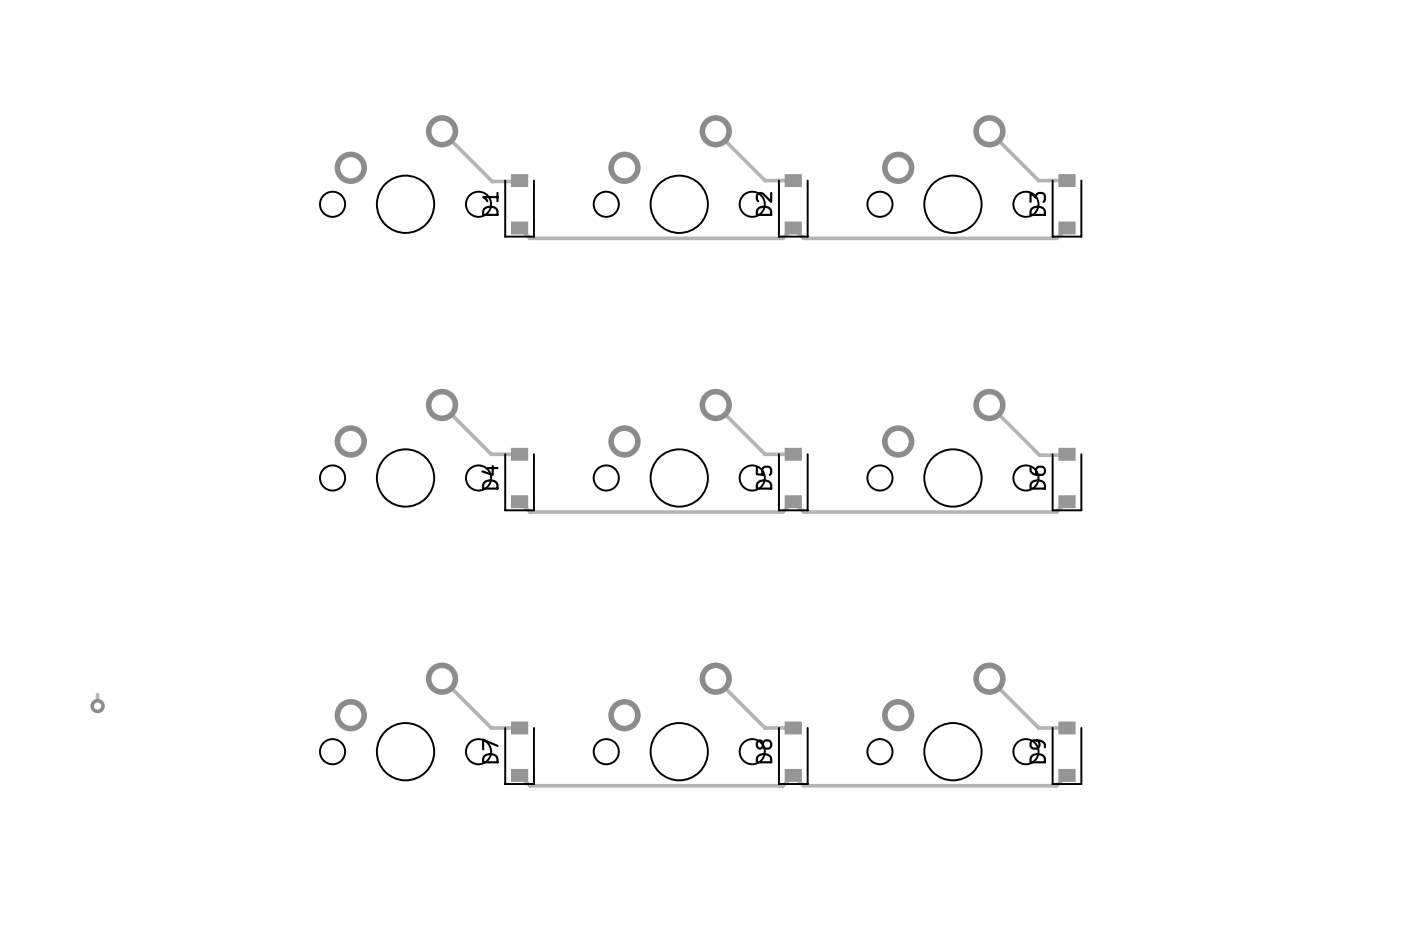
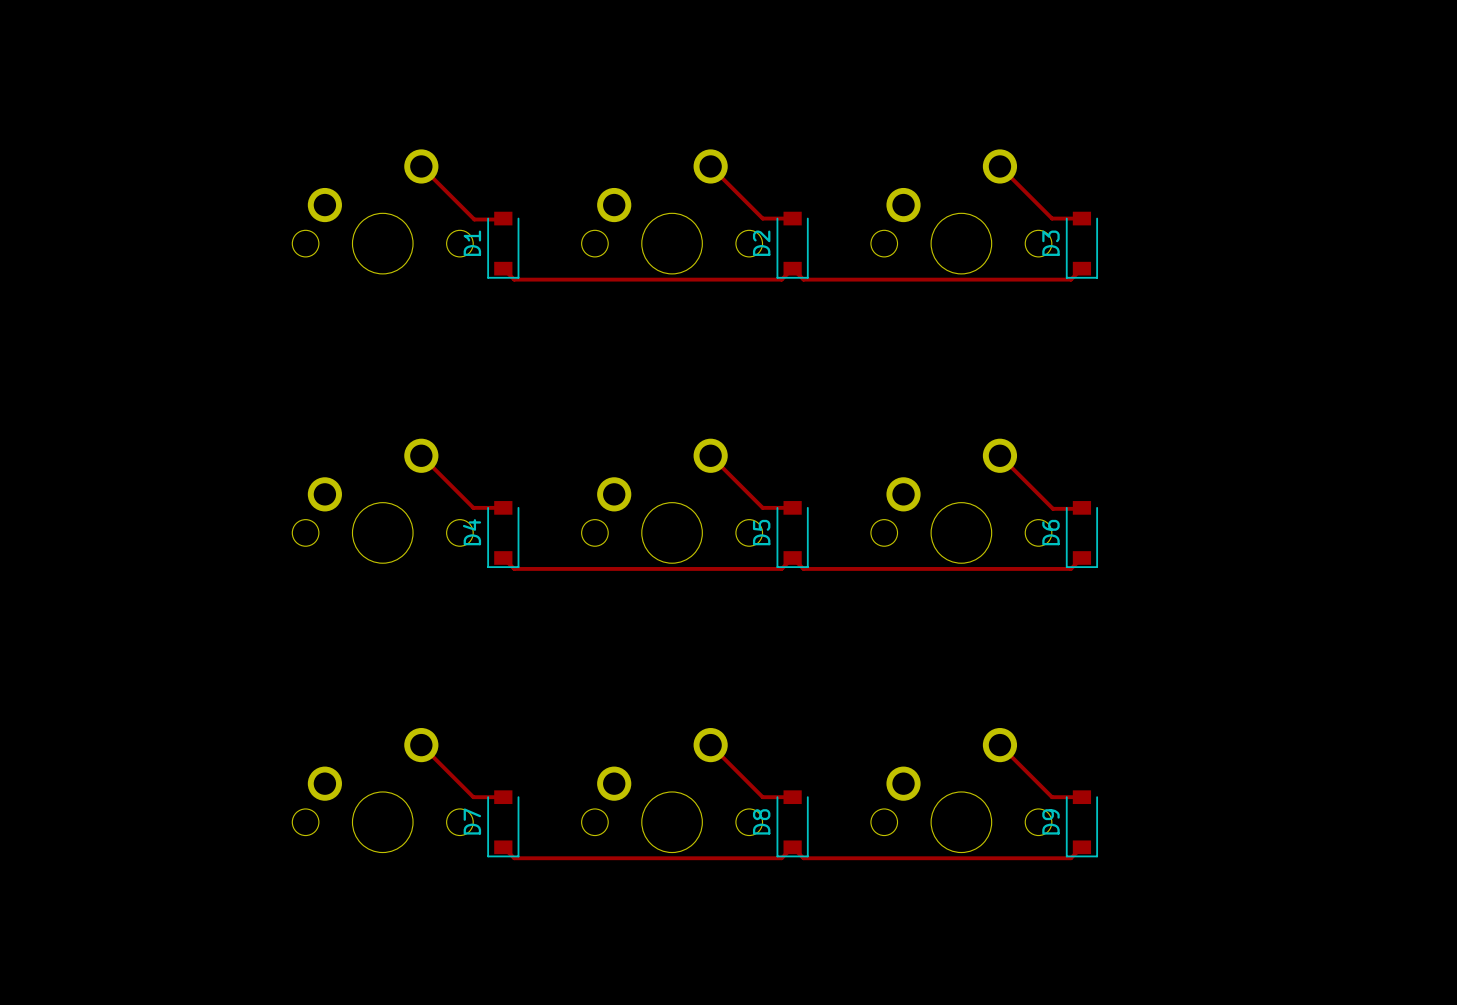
track: (97, 694) (97, 706) -> none
via: (97, 706) -> none

